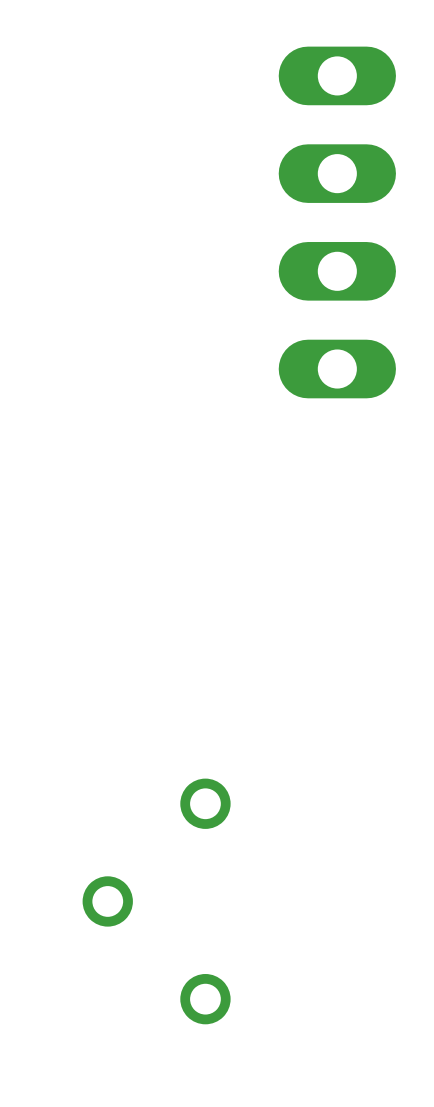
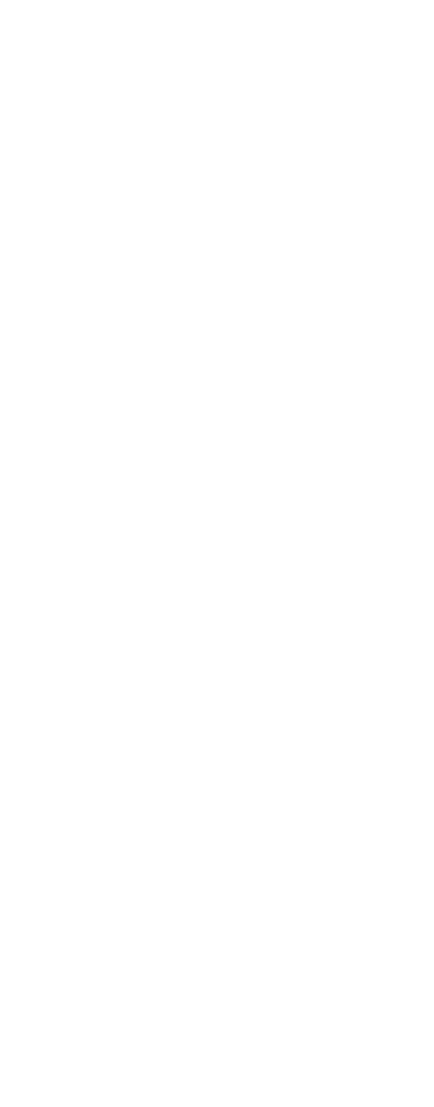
part: (337, 222) -> none
part: (156, 901) -> none

